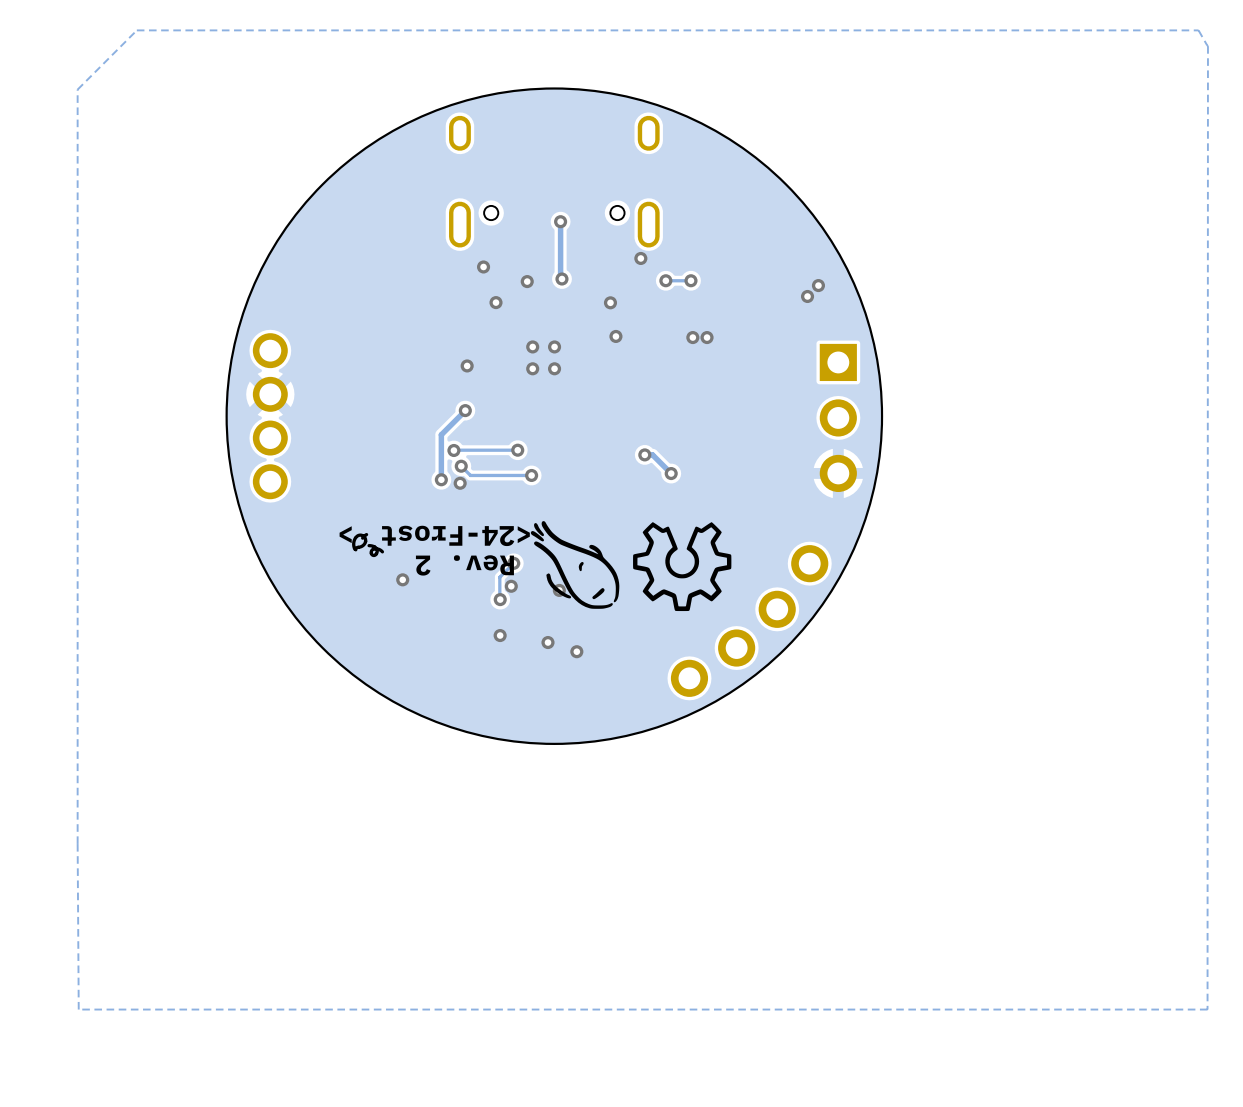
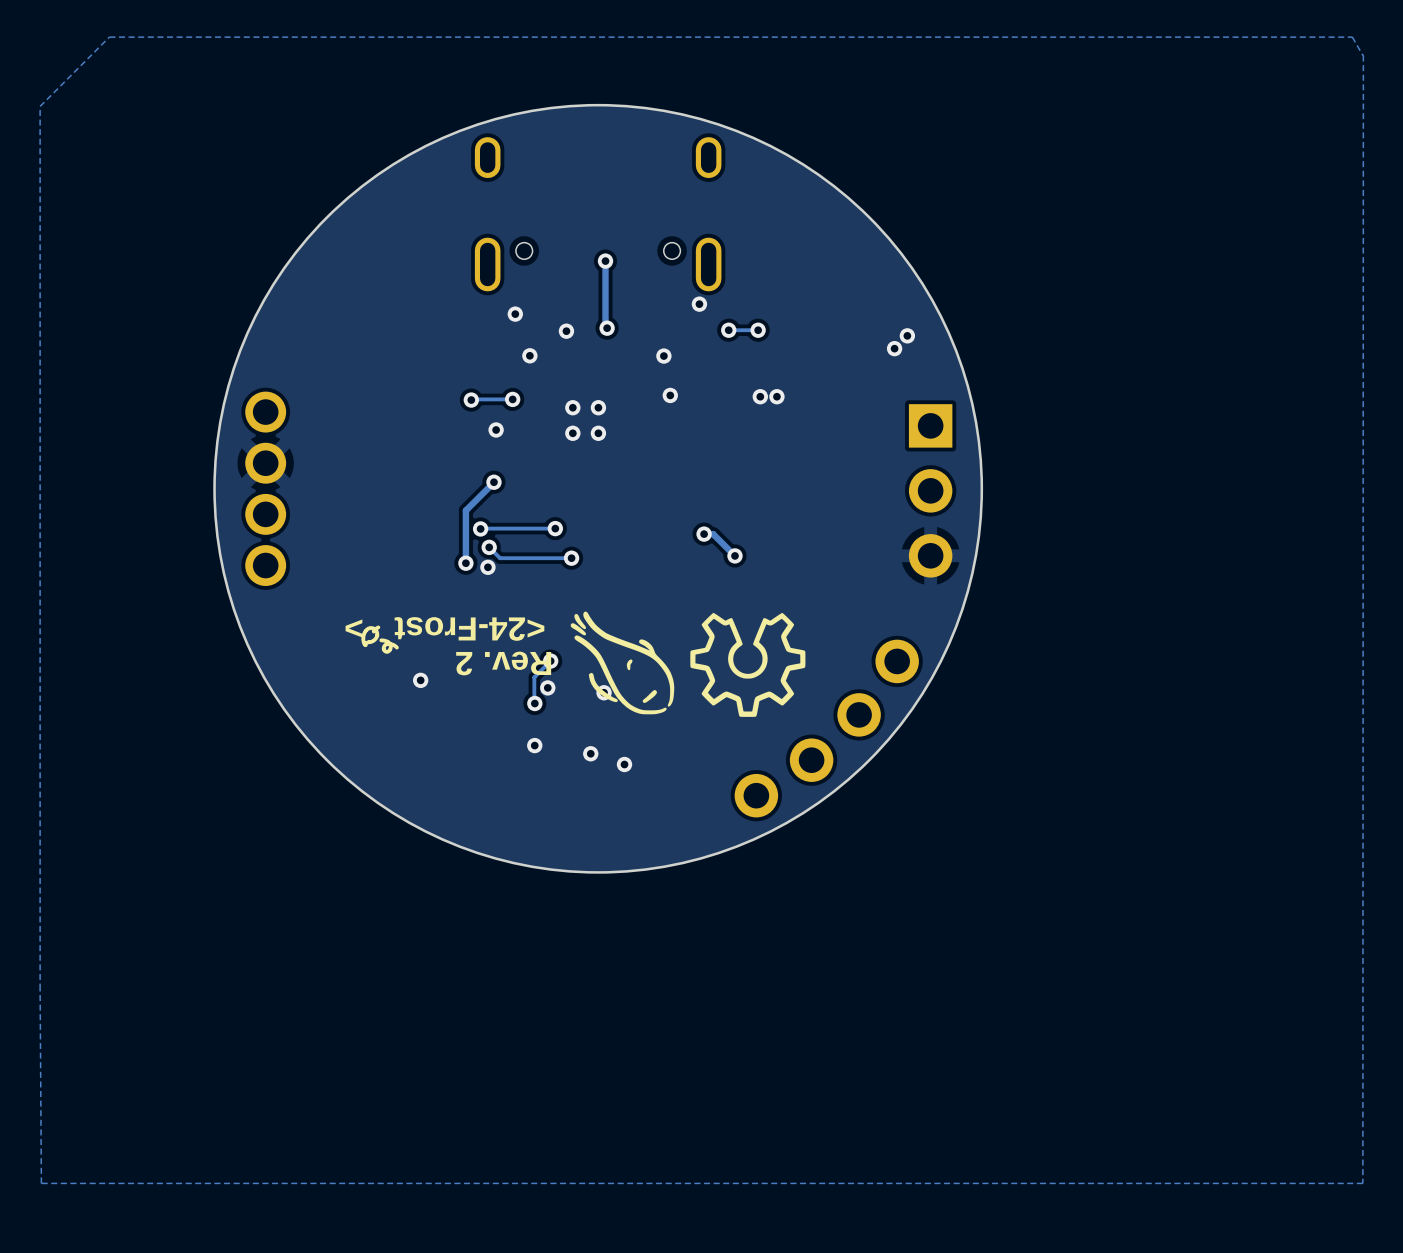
track: none -> (512, 399) (471, 400)
via: none -> (512, 399)
via: none -> (471, 400)

